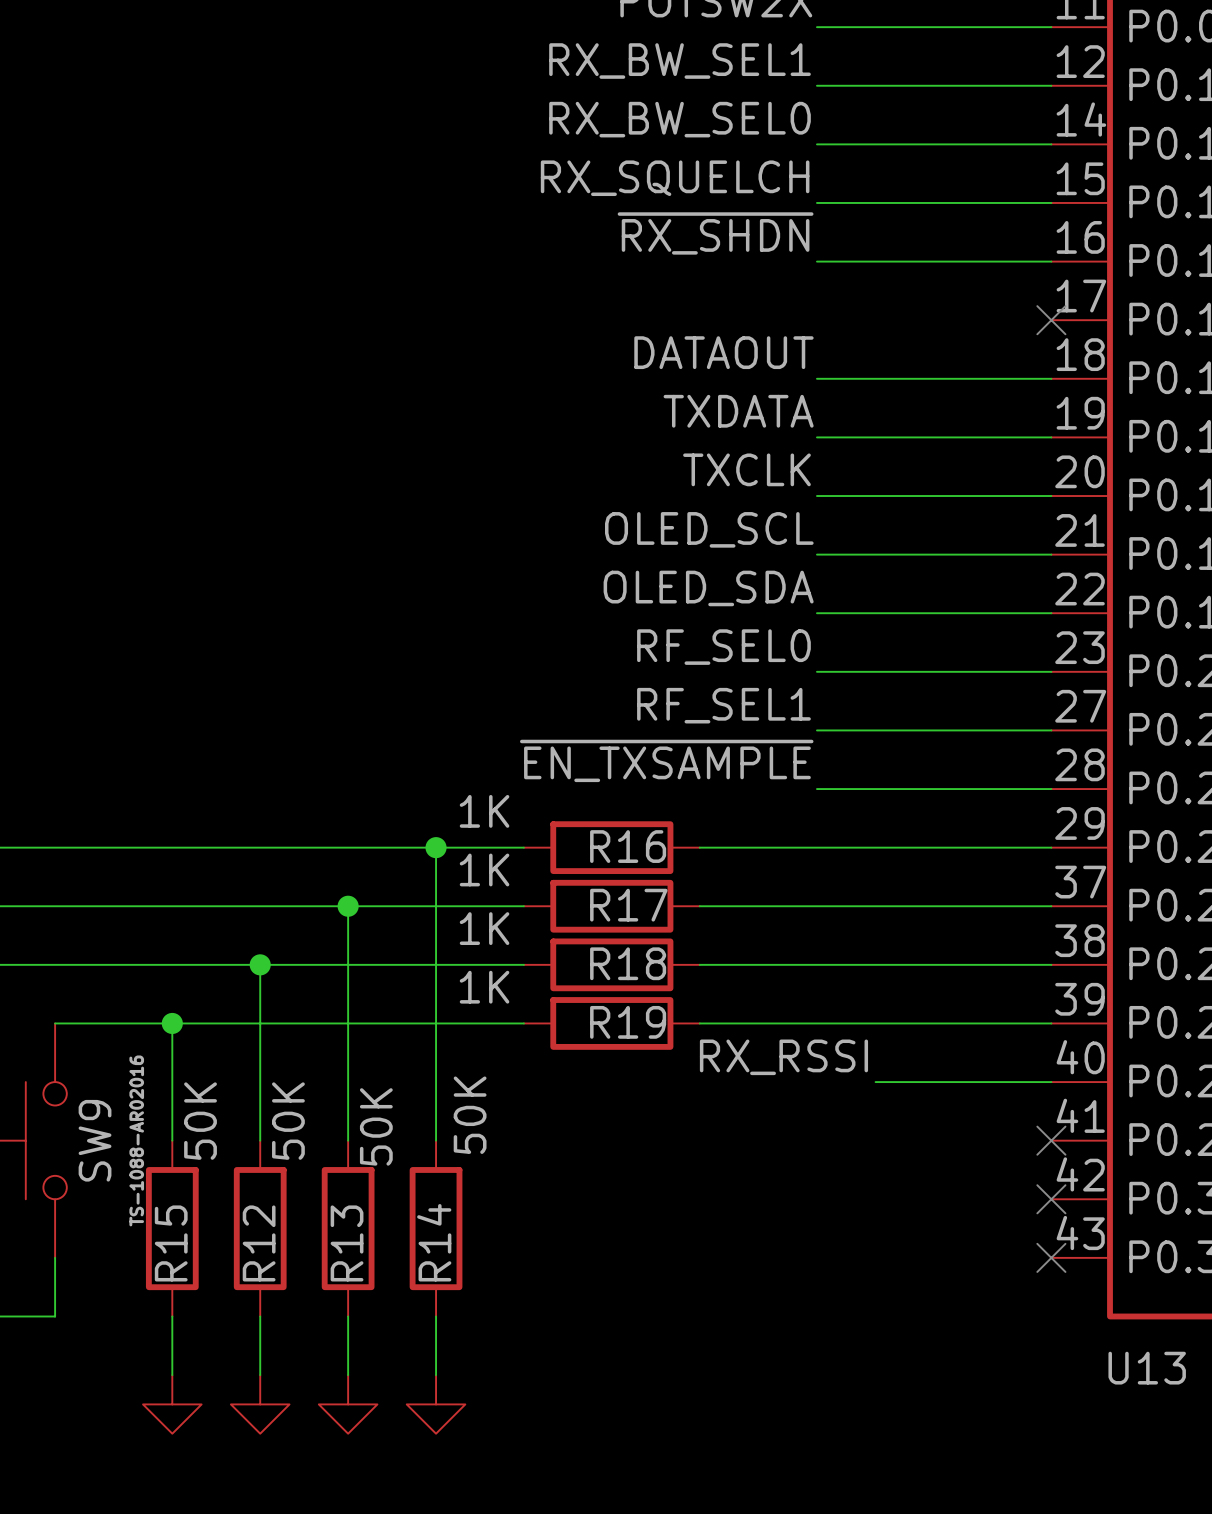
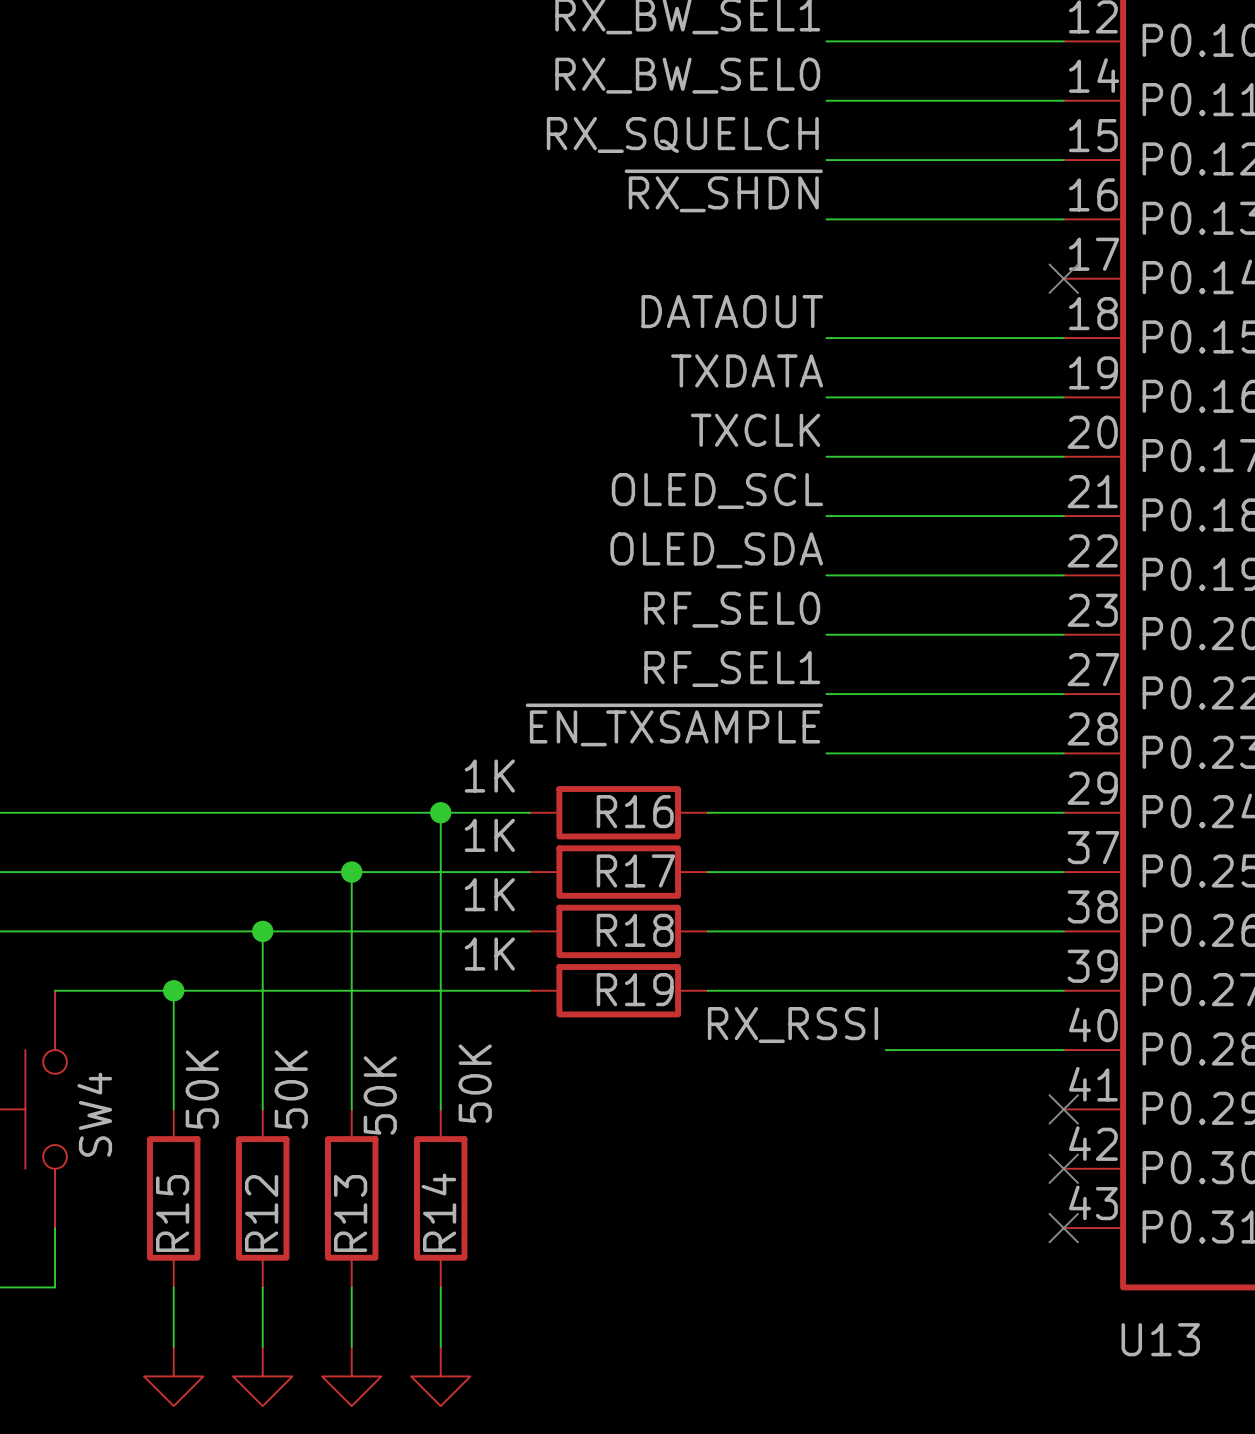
SW9 name: SW9 (95, 1140) -> SW4 (94, 1114)
SW9 value: TS-1088-AR02016 (136, 1140) -> none

